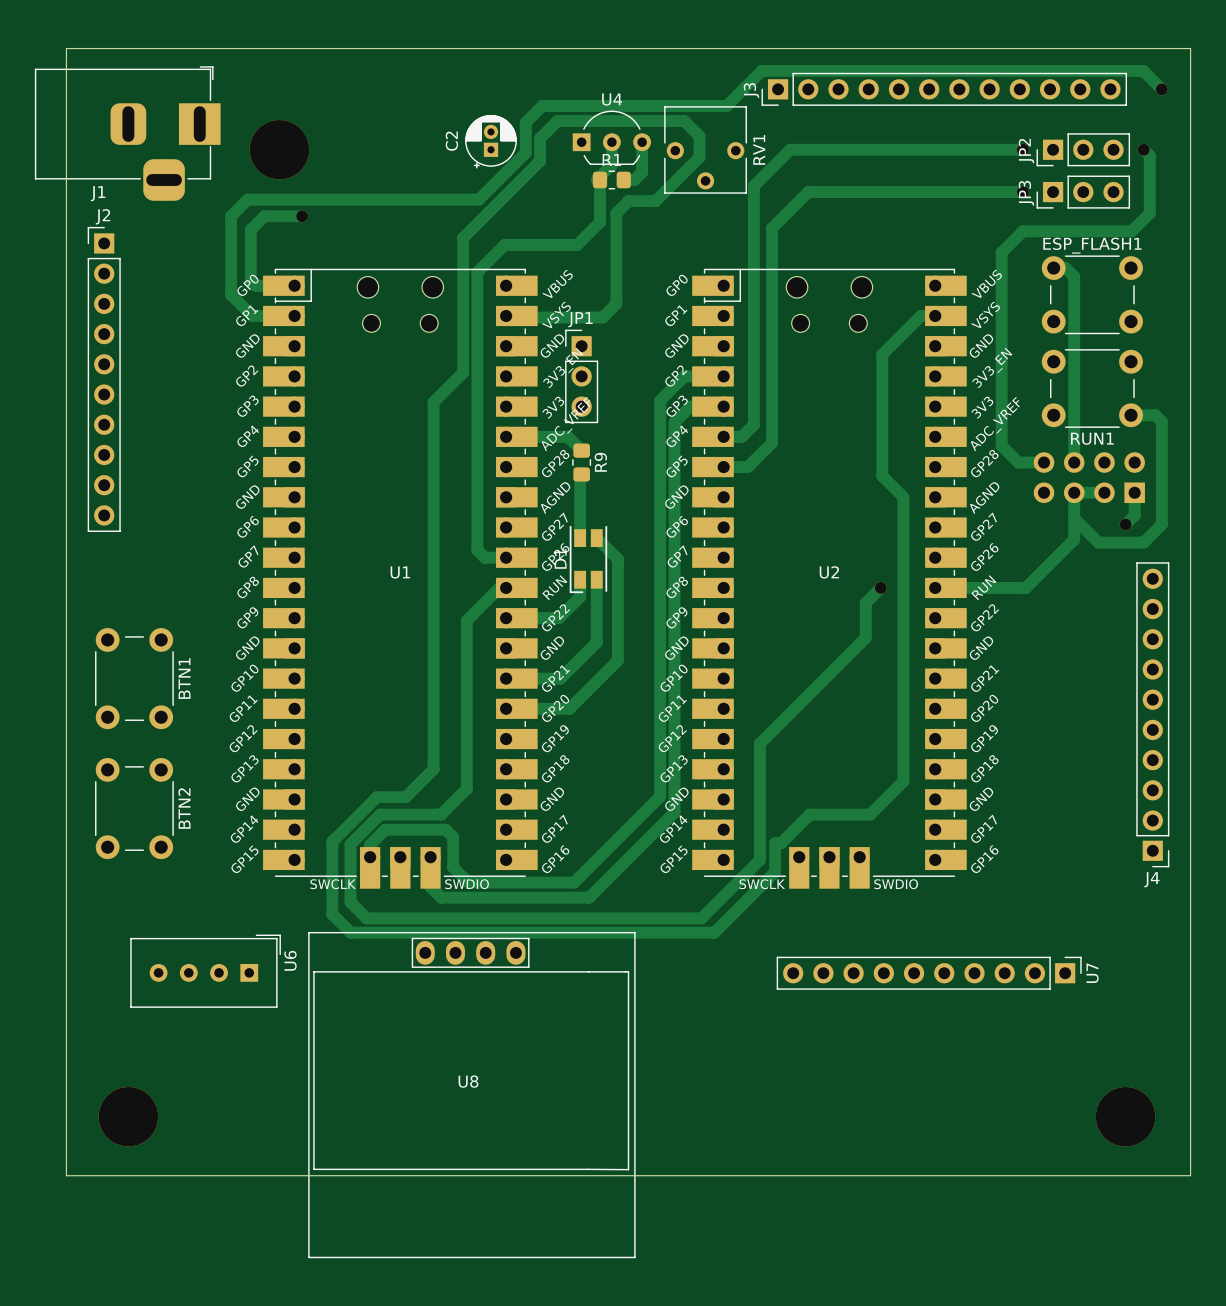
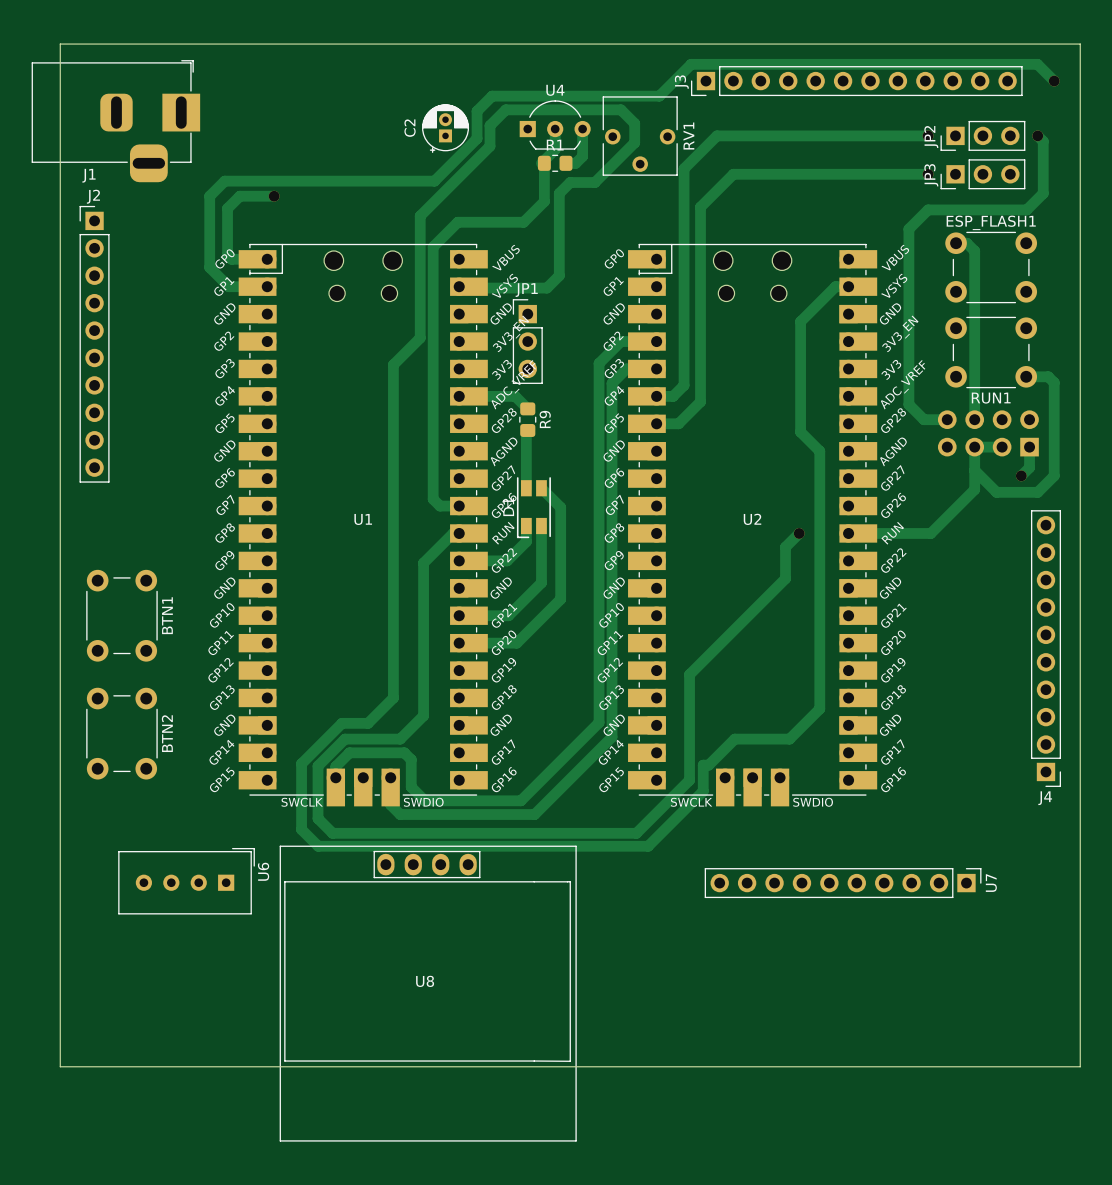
via: (279, 149) -> none
via: (128, 1116) -> none
via: (1125, 1116) -> none

